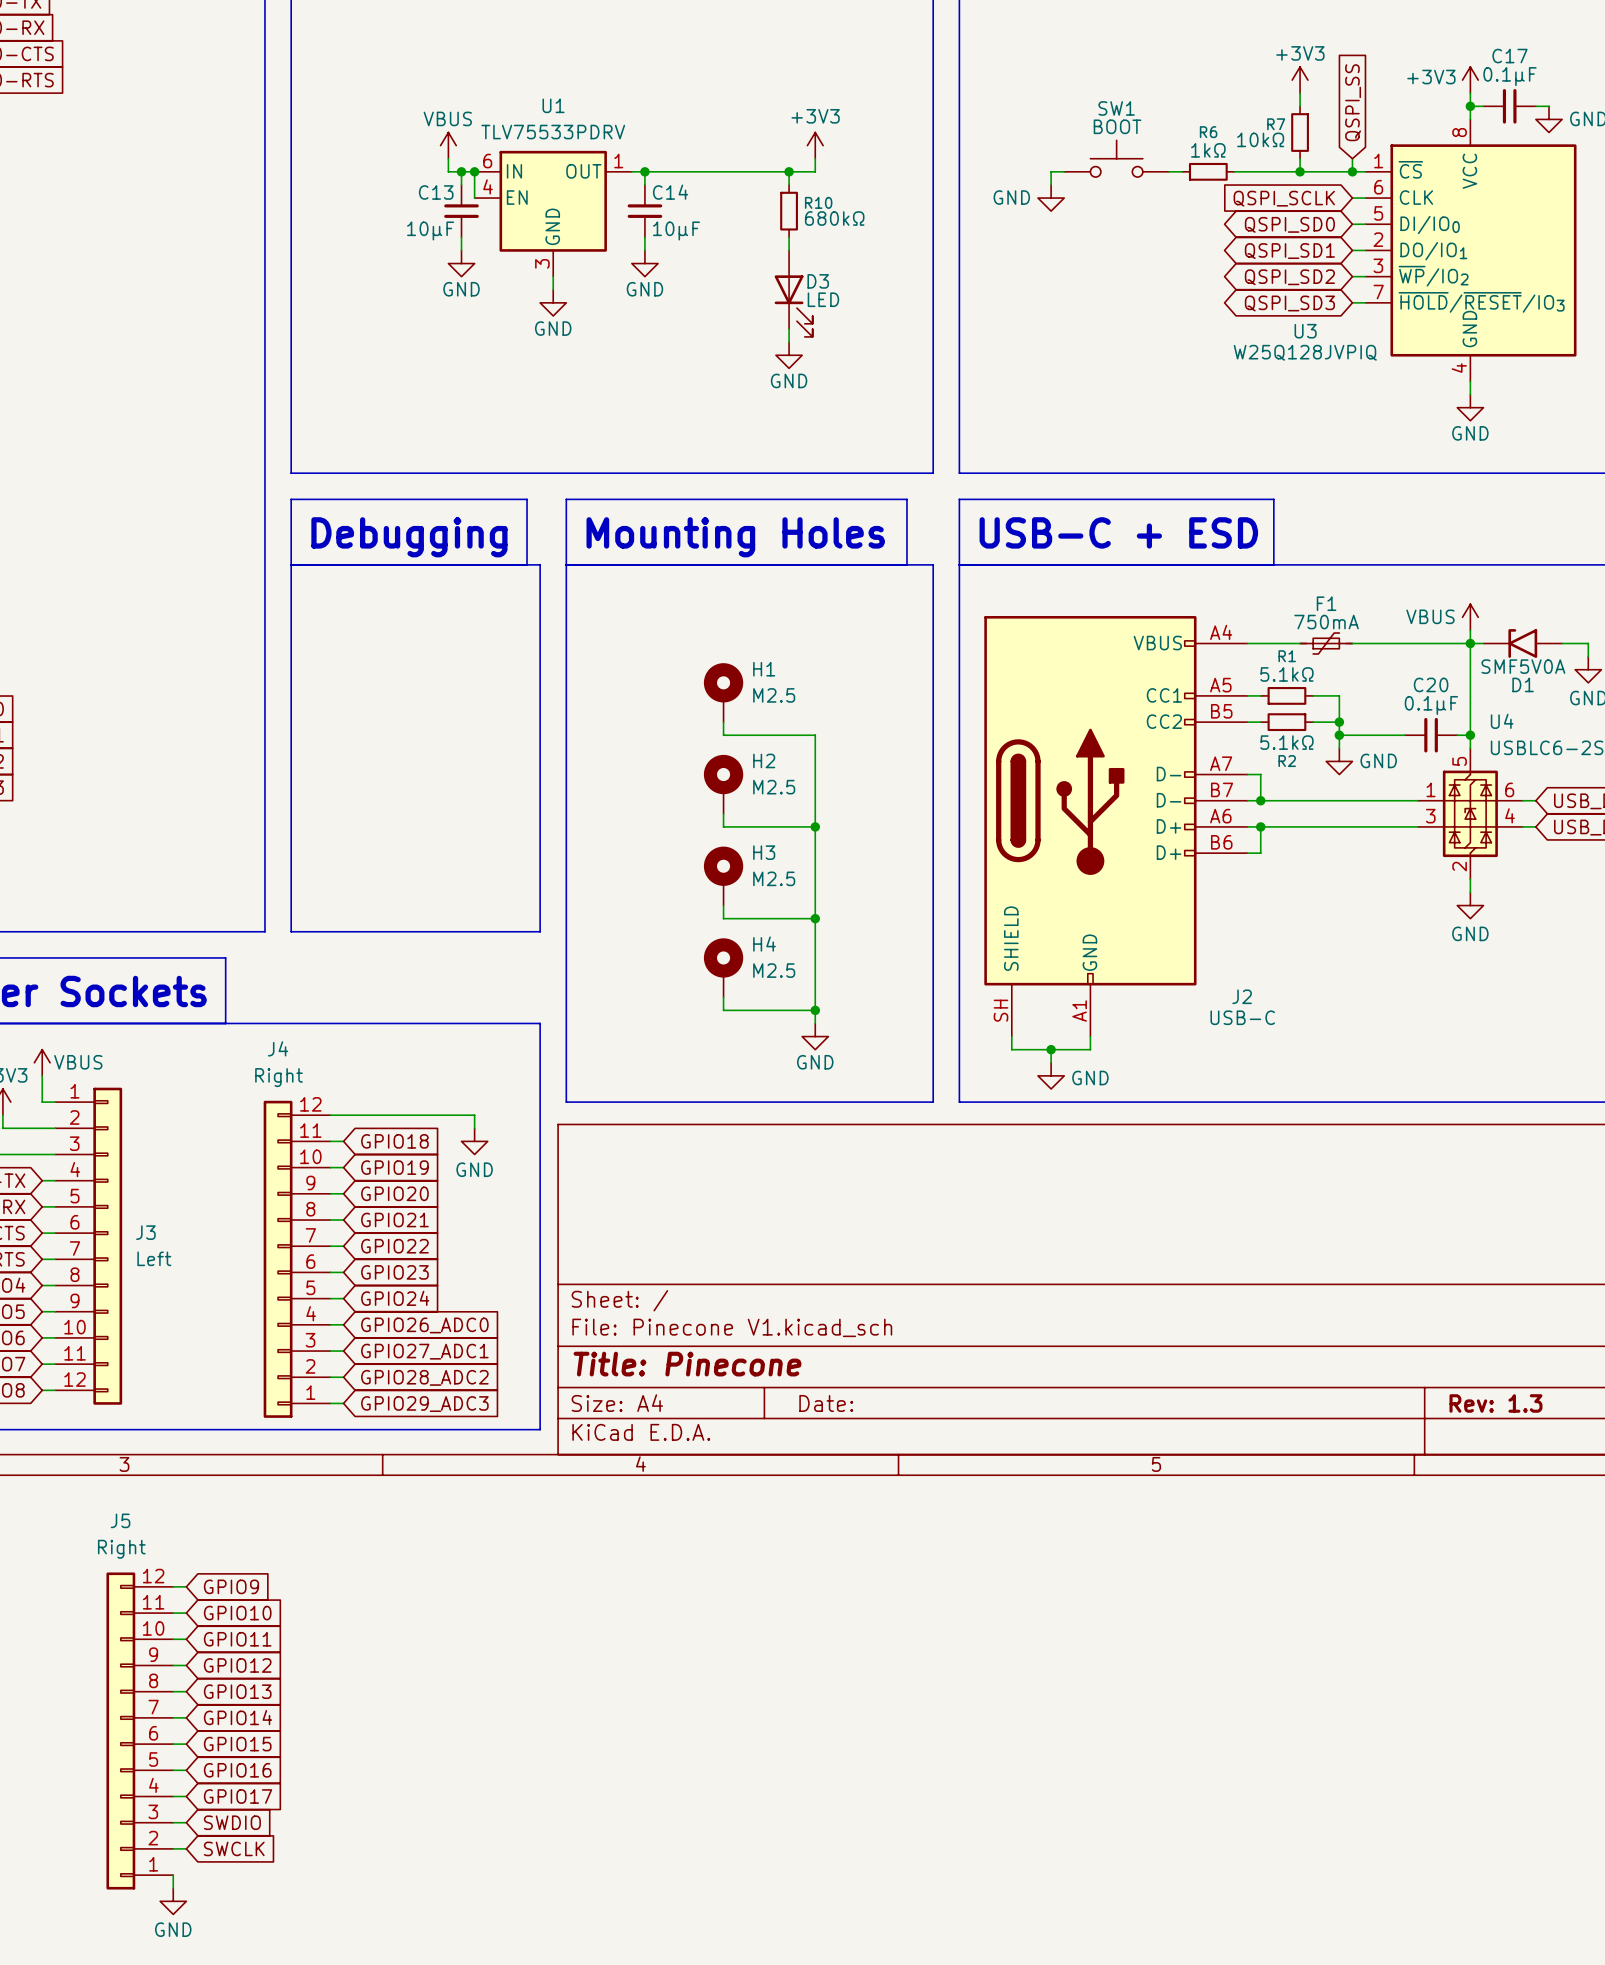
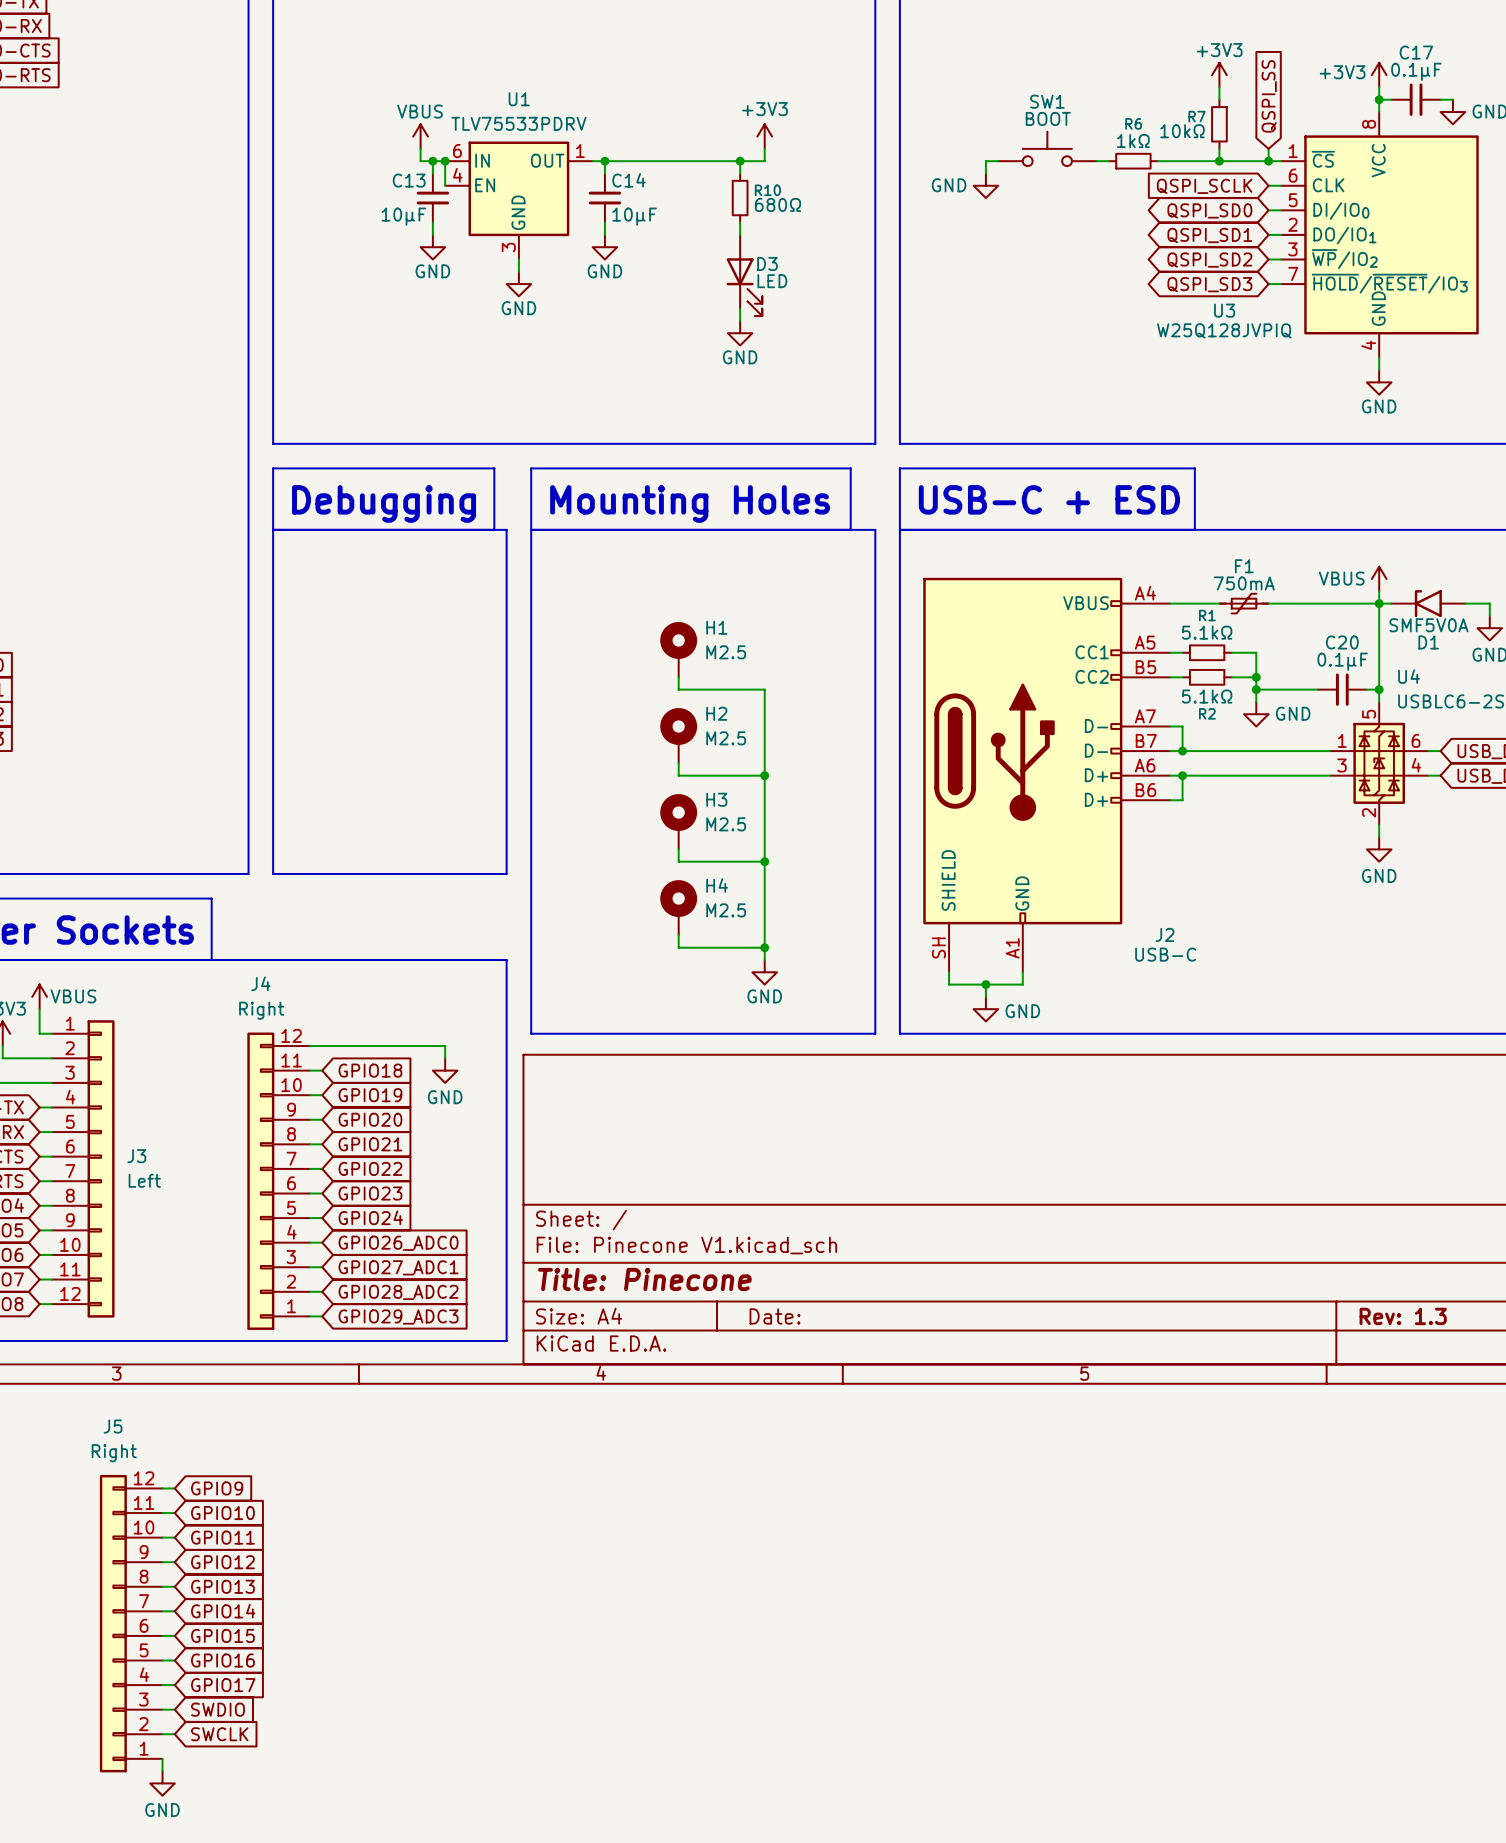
R10 value: 680kΩ (834, 218) -> 680Ω (777, 204)

